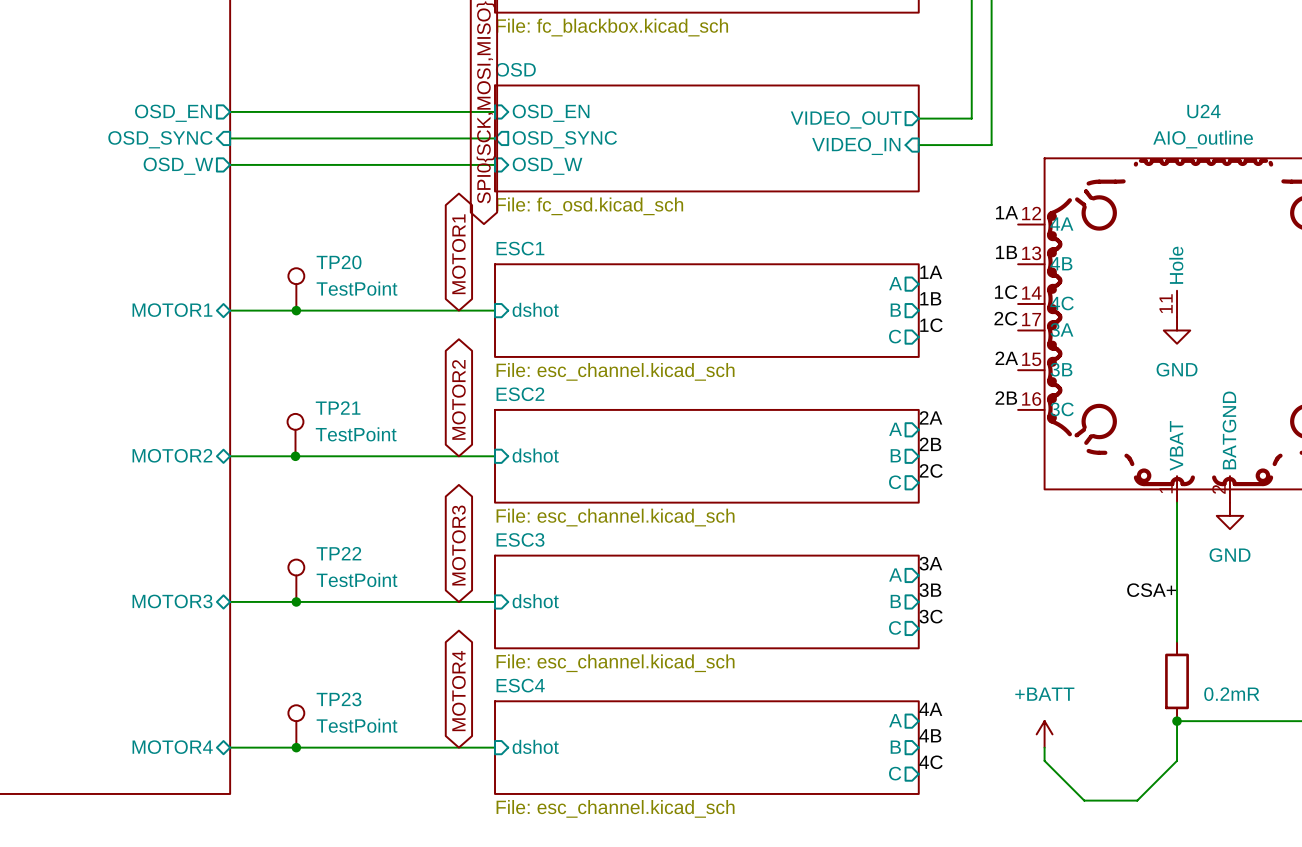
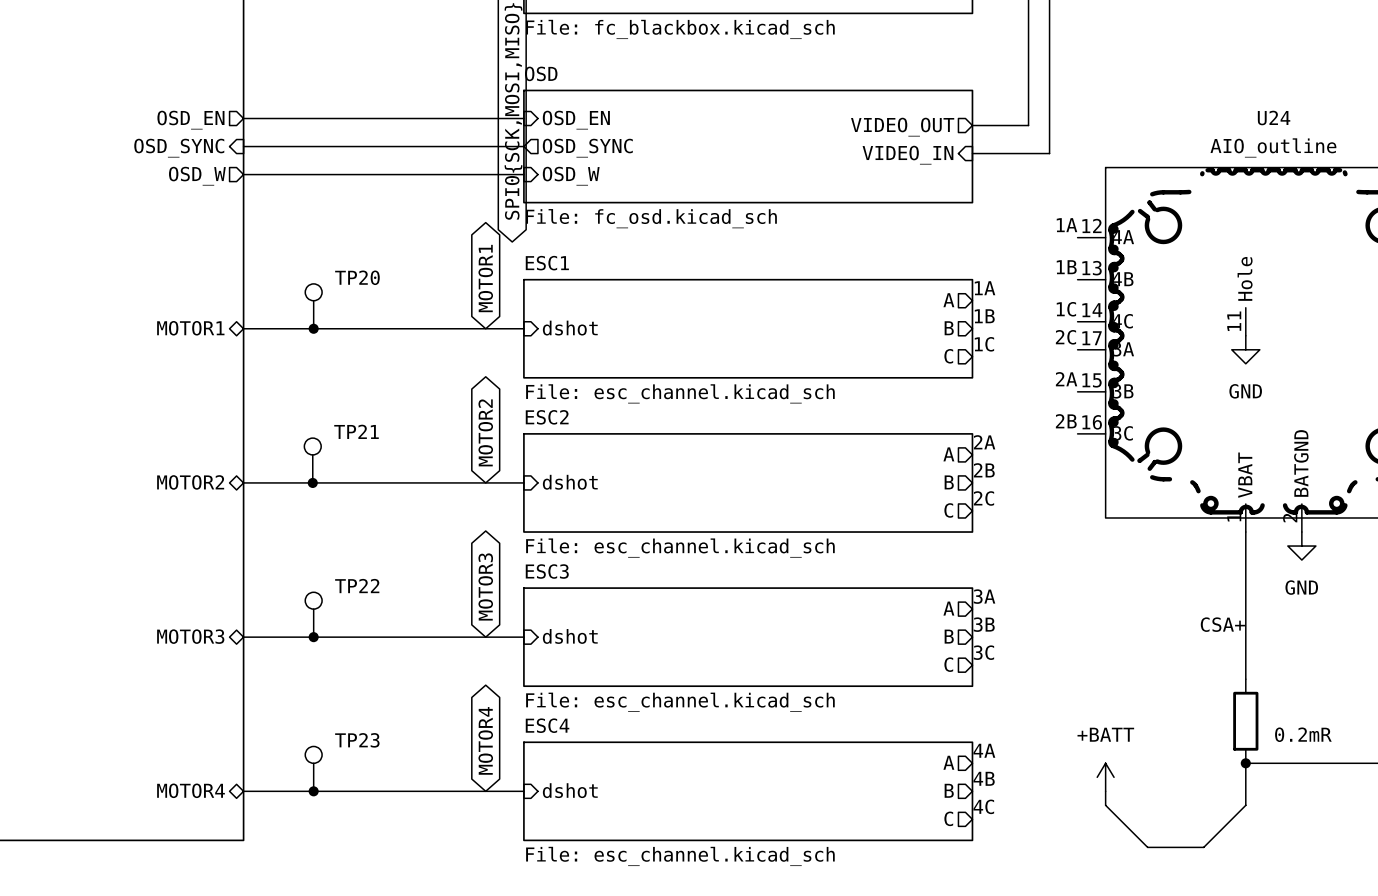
TP20 value: TestPoint (357, 288) -> none
TP21 value: TestPoint (356, 434) -> none
TP22 value: TestPoint (357, 580) -> none
TP23 value: TestPoint (357, 725) -> none

